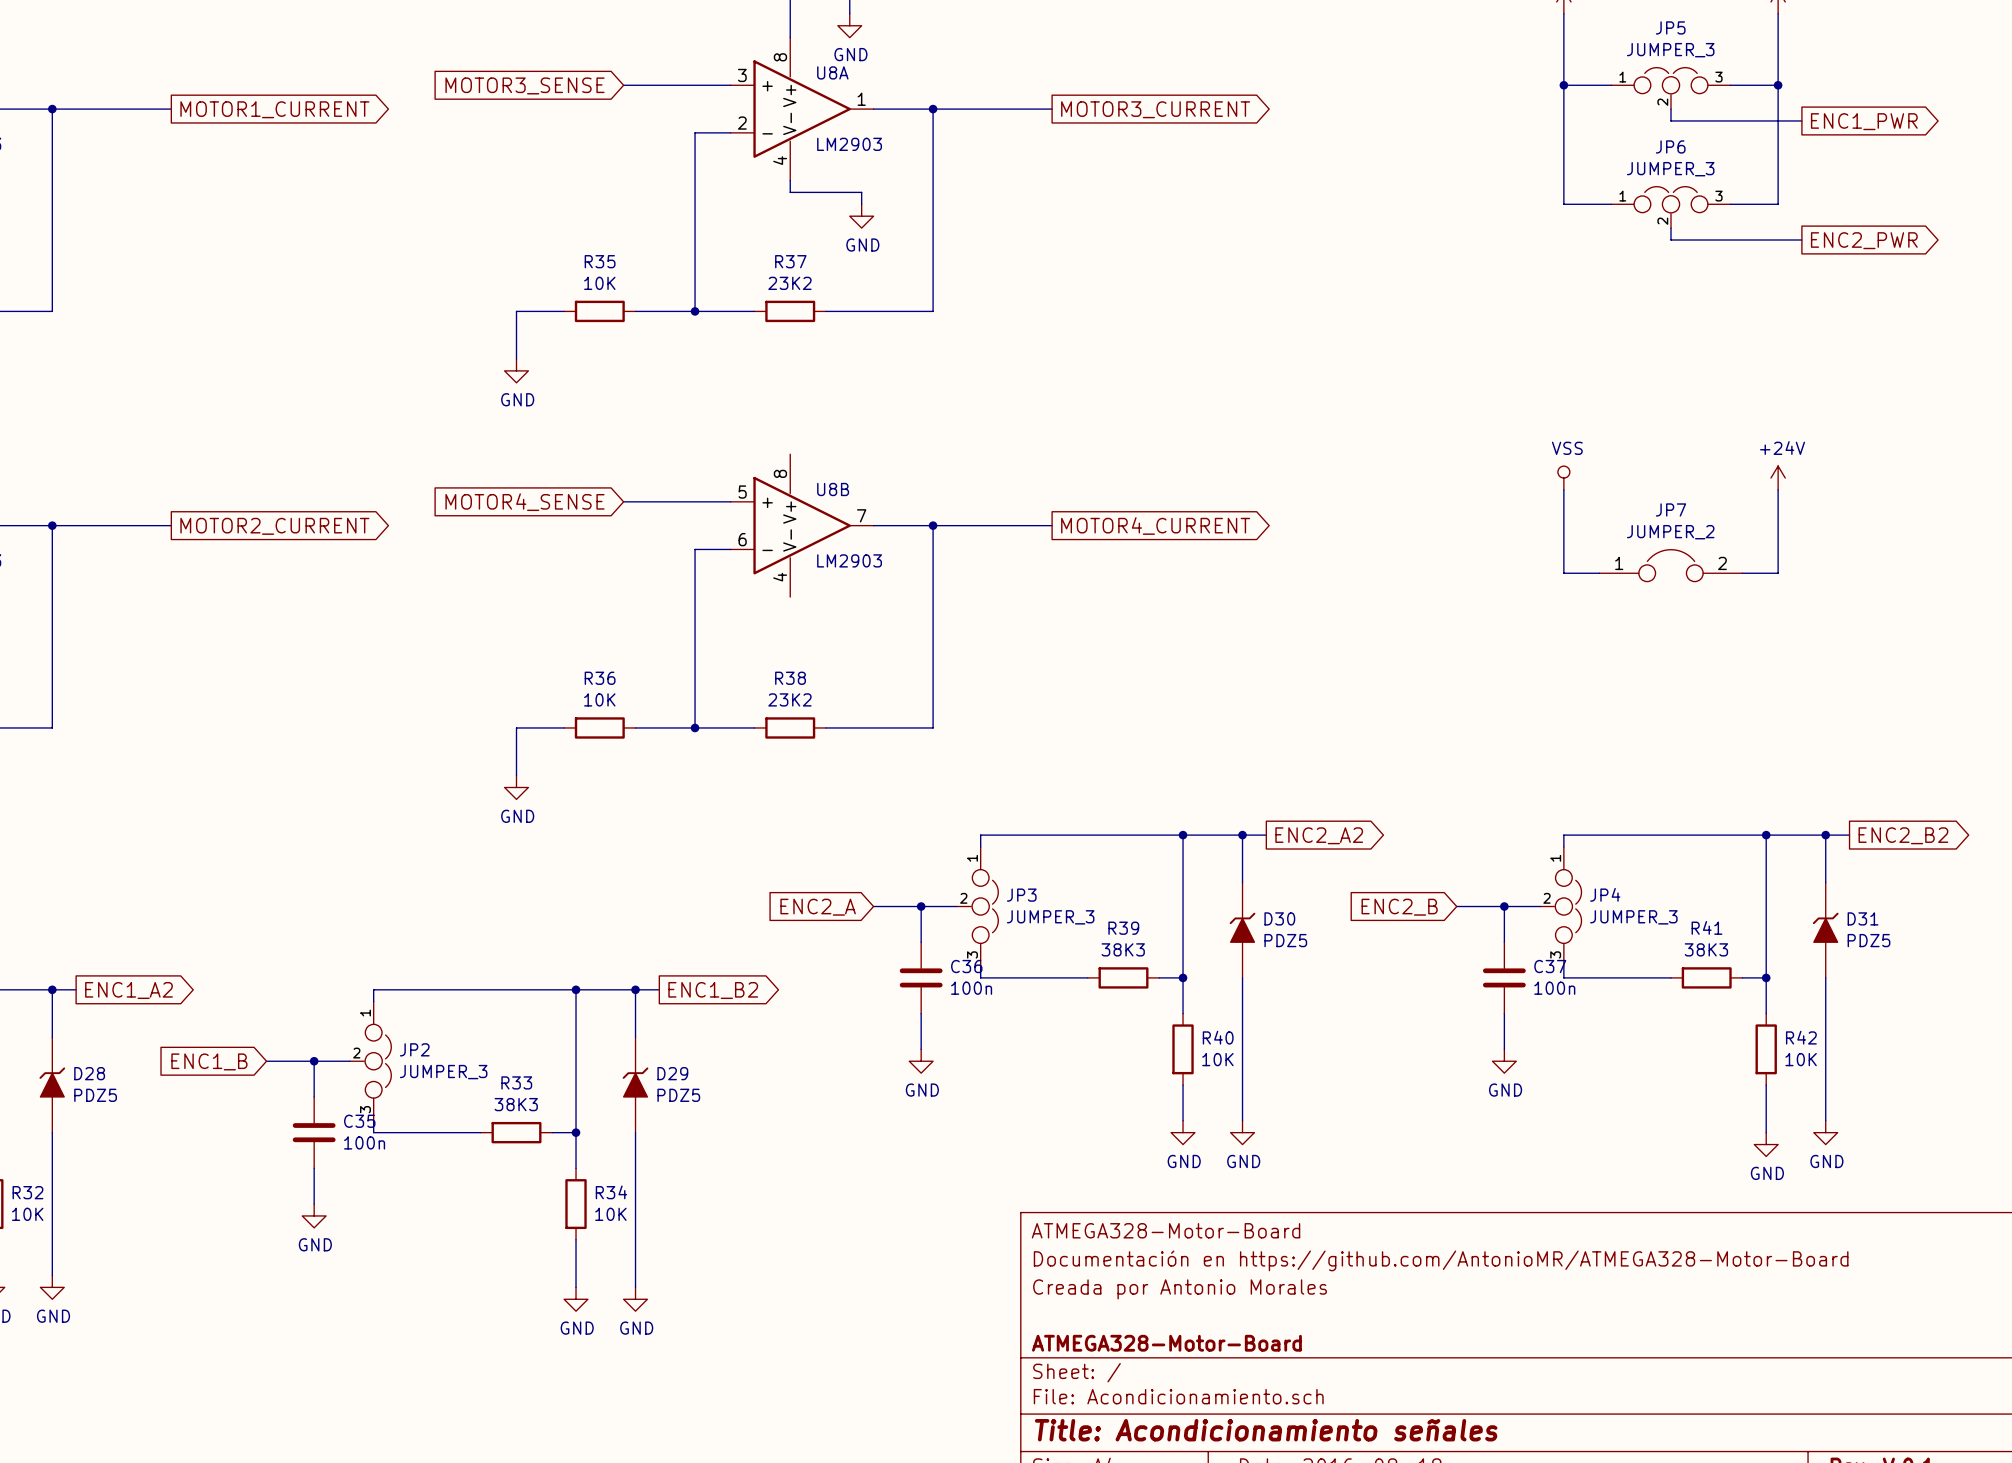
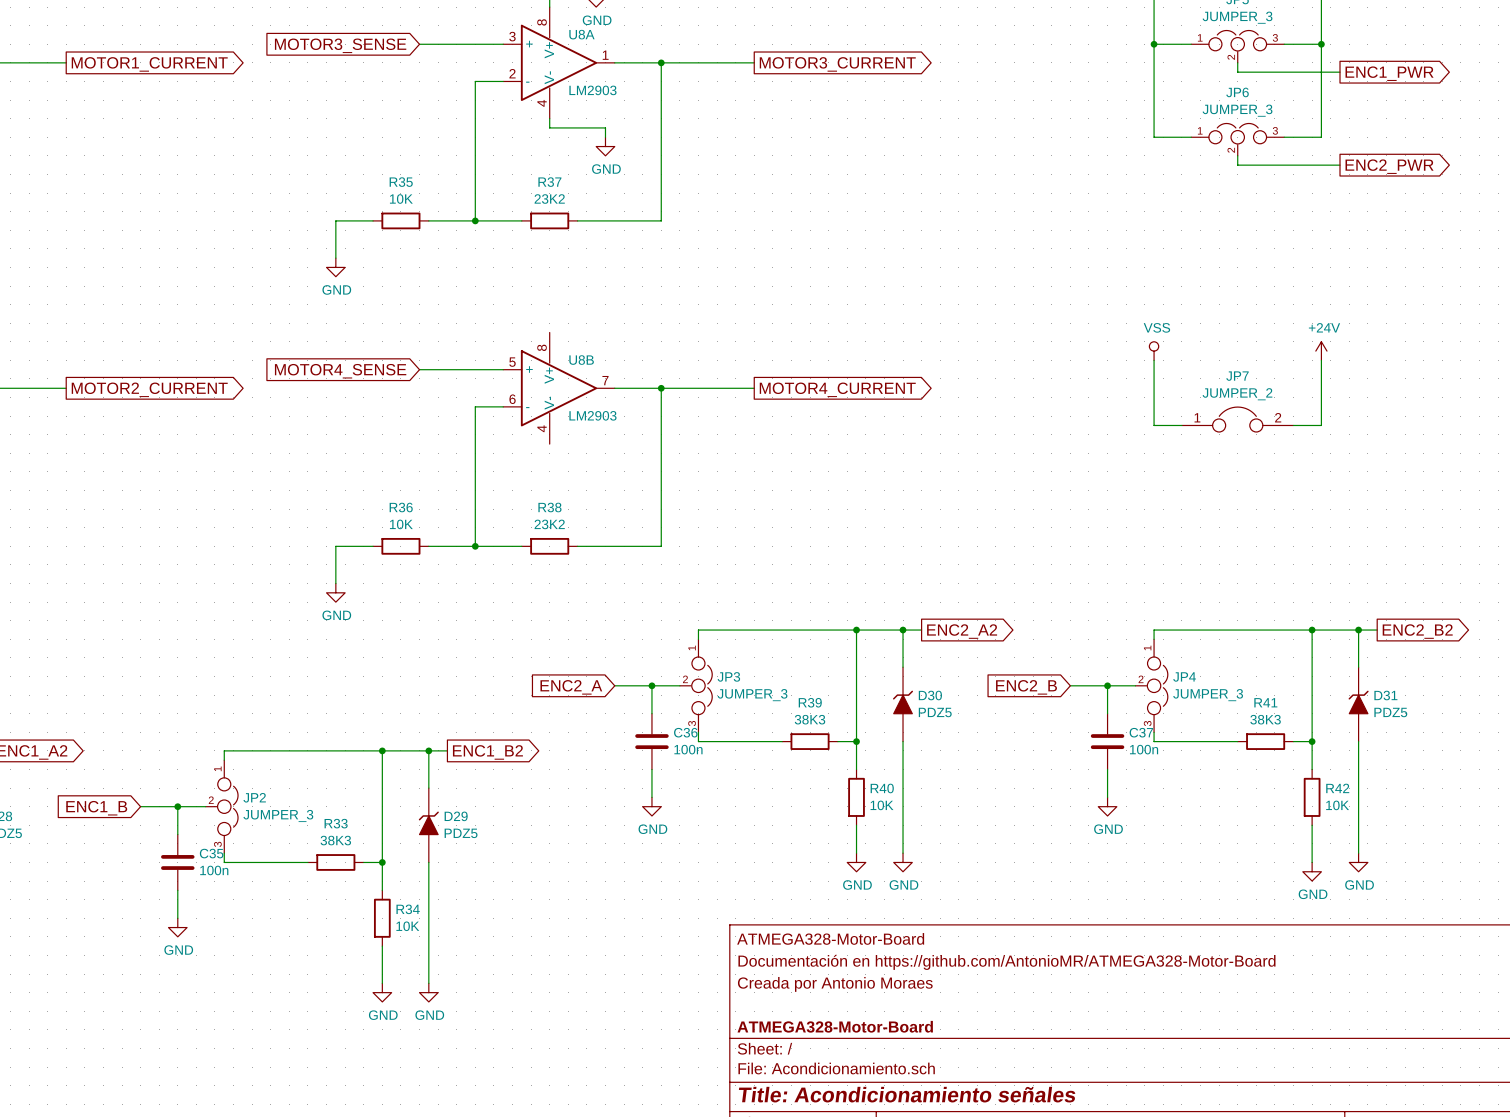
title block: Creada por Antonio Morales (1180, 1289) -> Creada por Antonio Moraes (835, 984)

